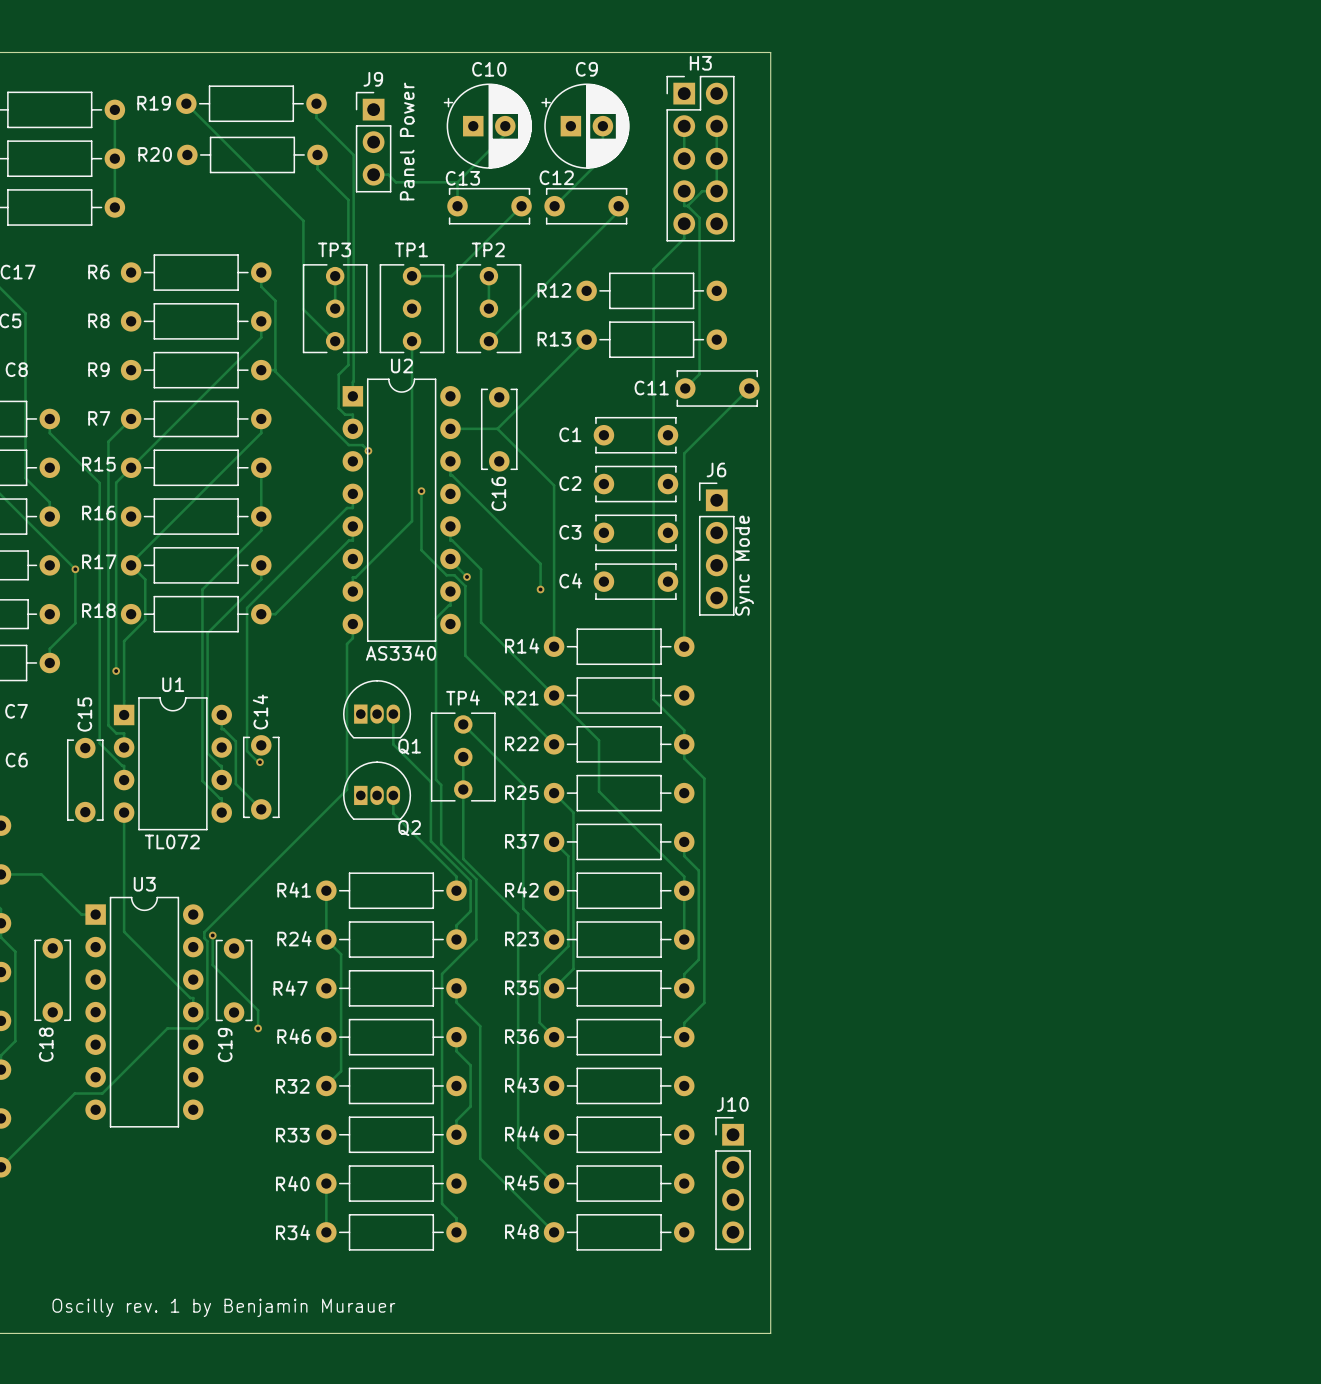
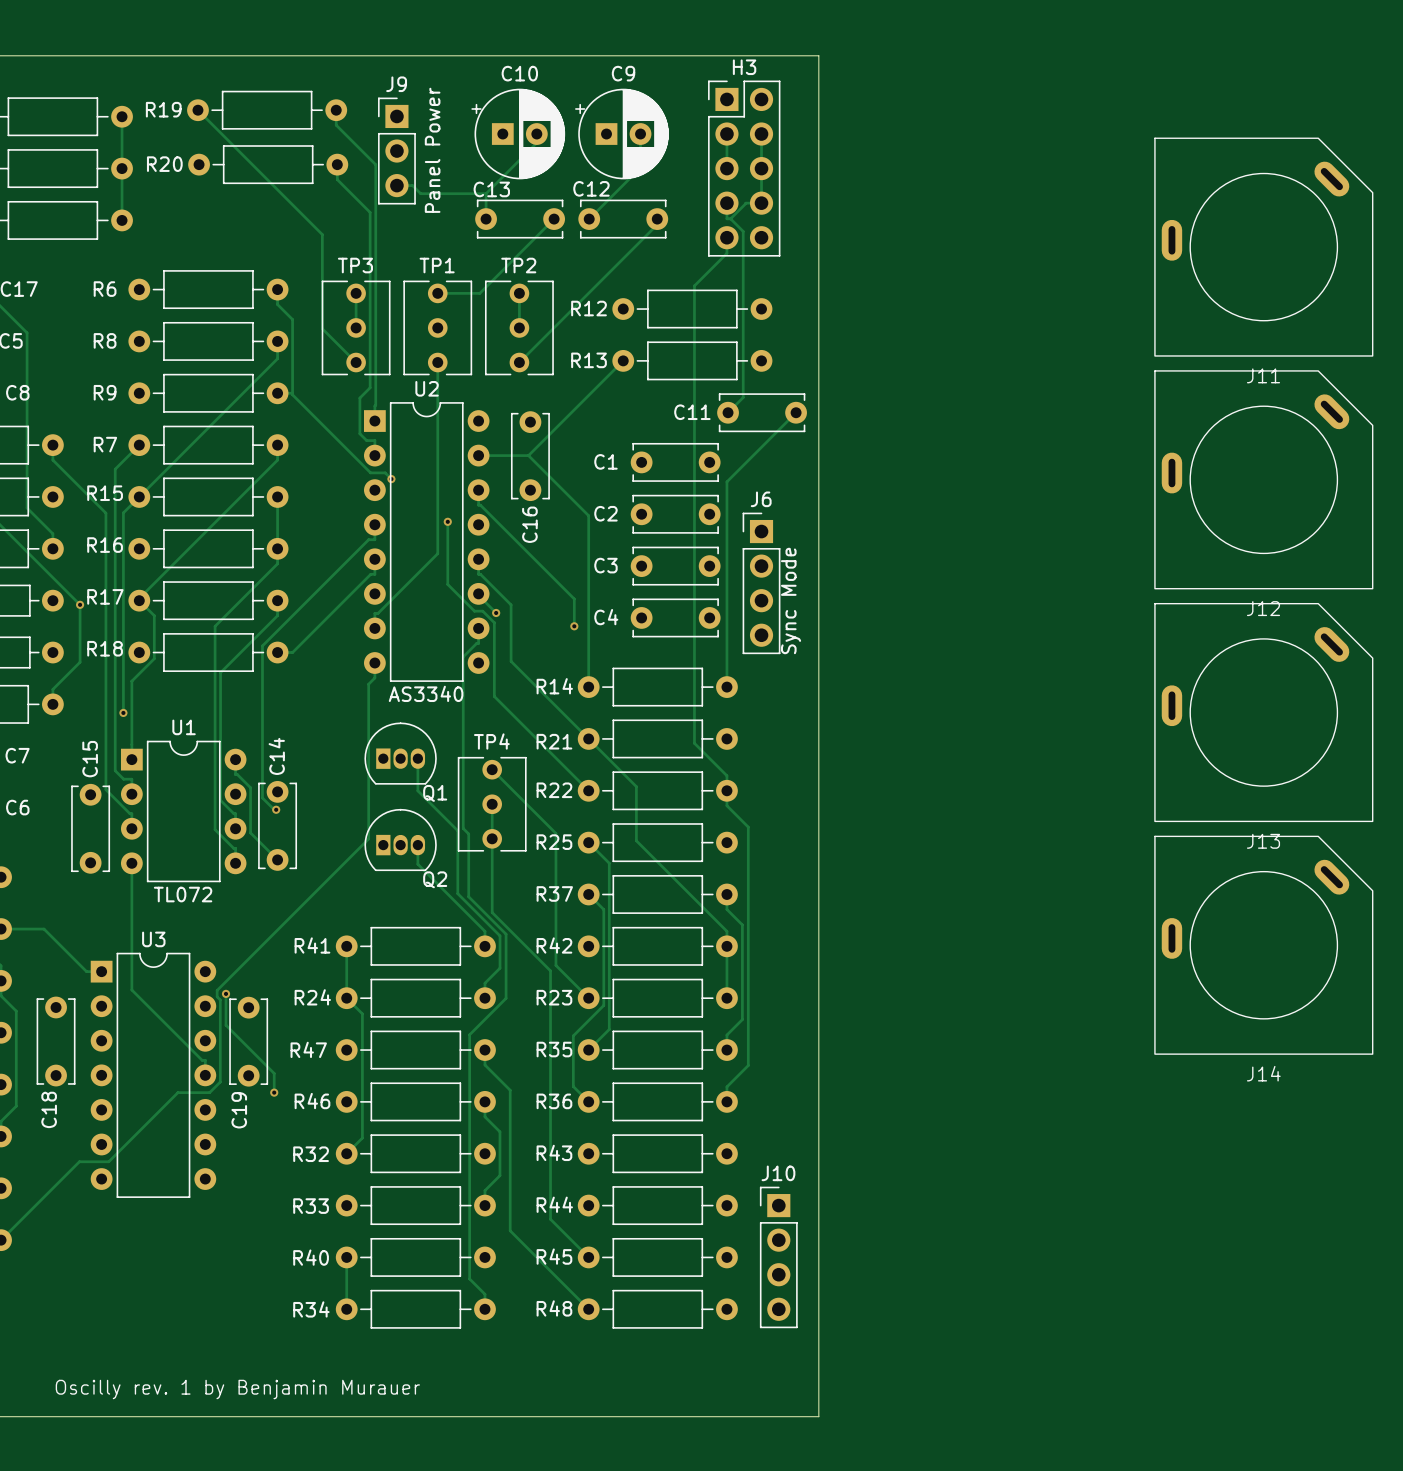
J11: none -> (1263, 247)
J12: none -> (1263, 479)
J13: none -> (1263, 712)
J14: none -> (1263, 945)

